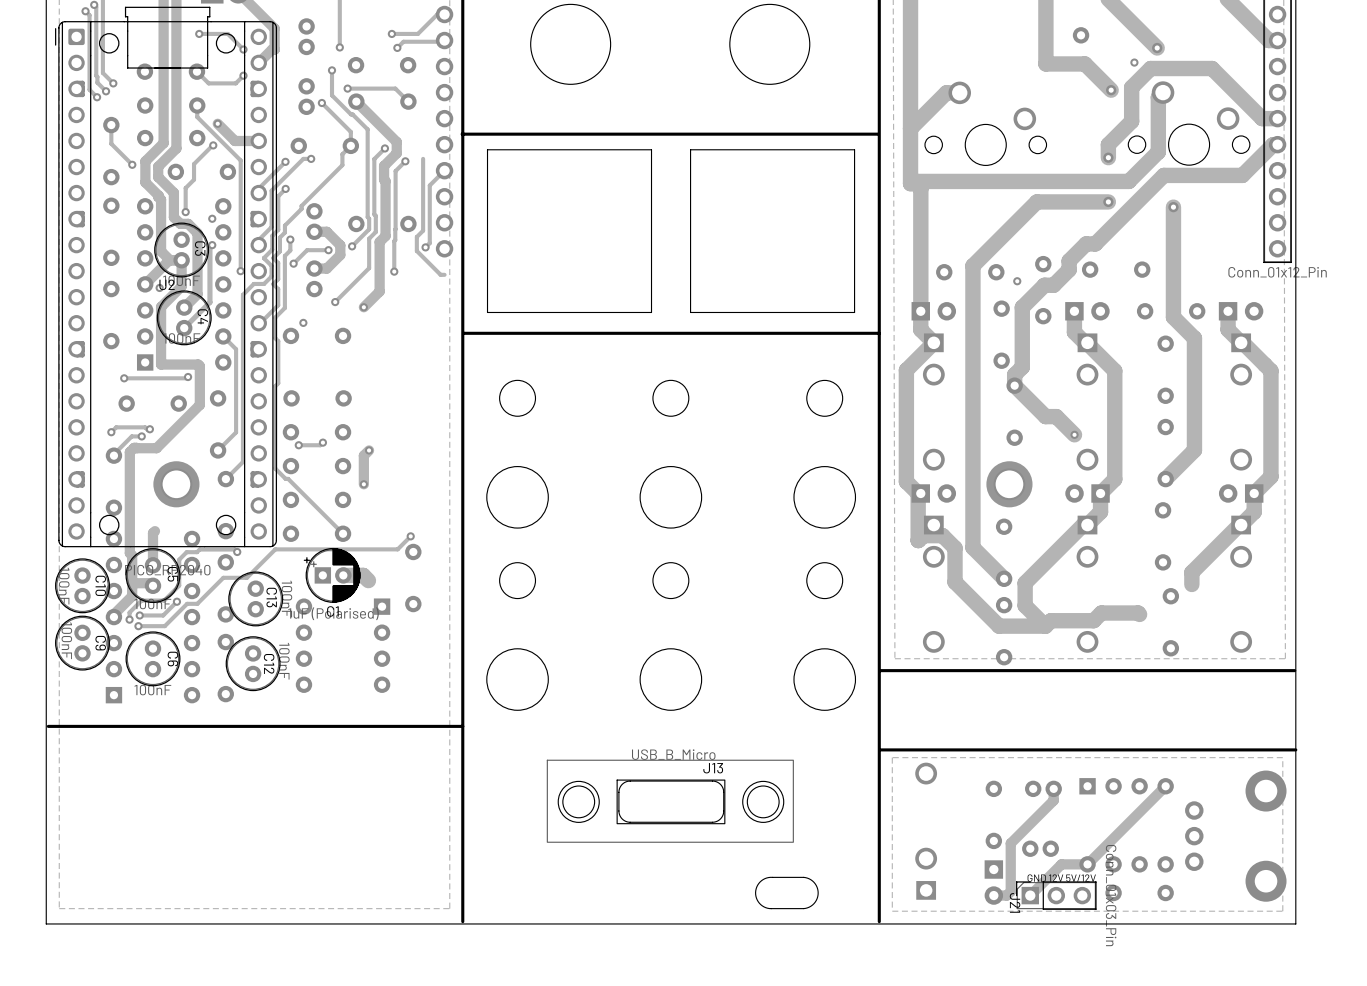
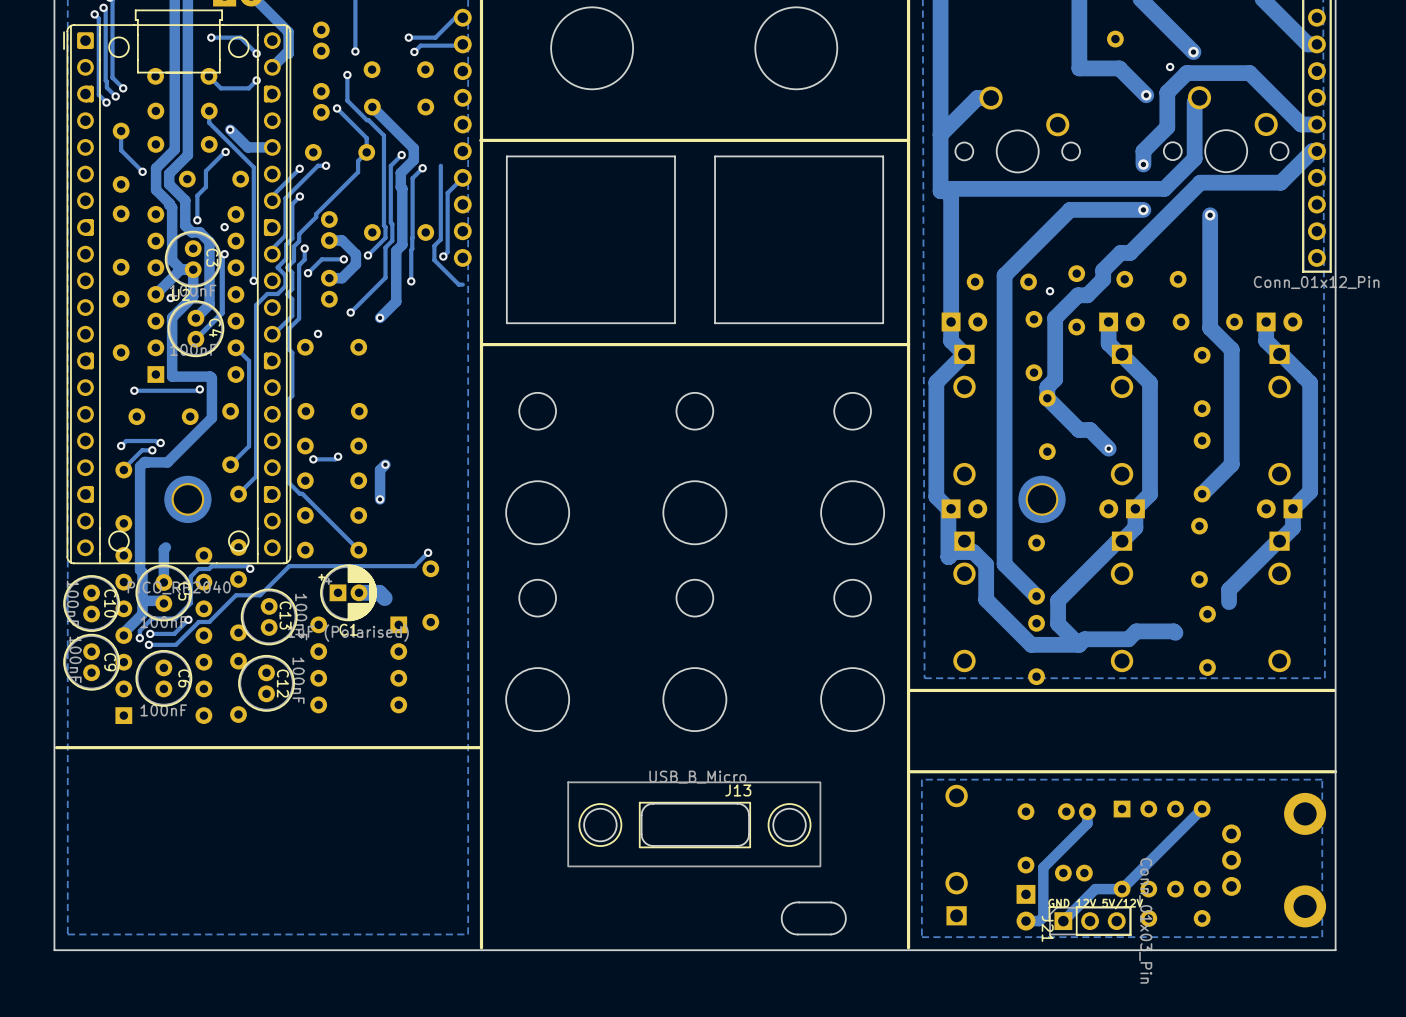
track: (347, 88) (395, 88) (408, 101) -> none
via: (347, 88) -> none

